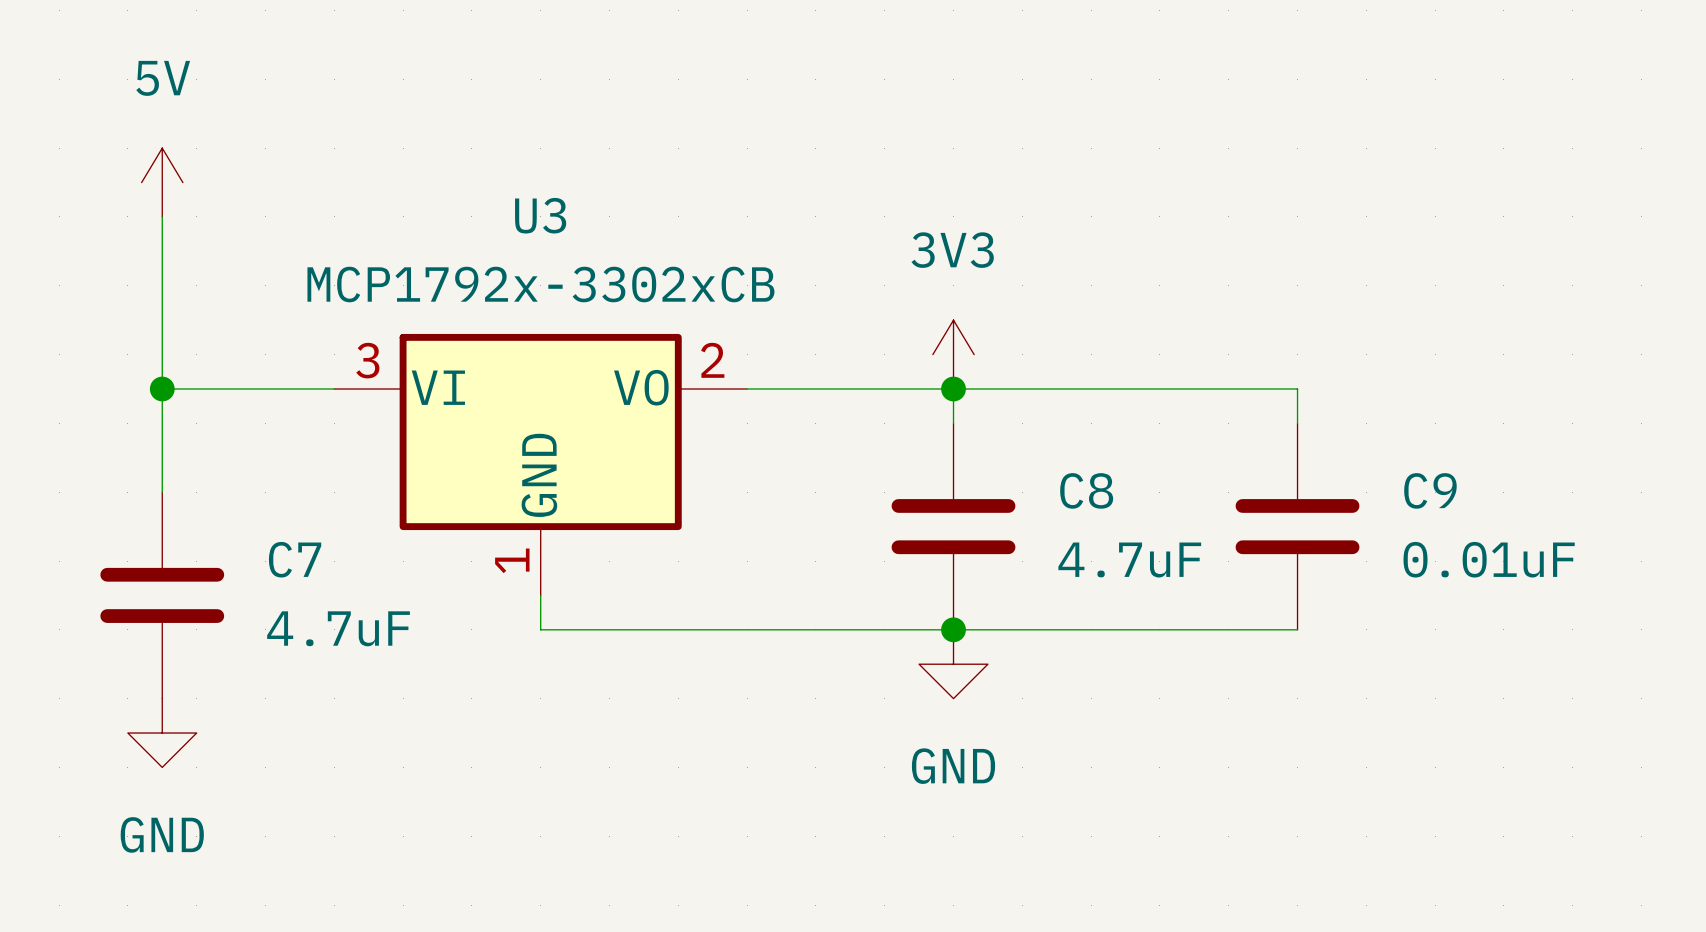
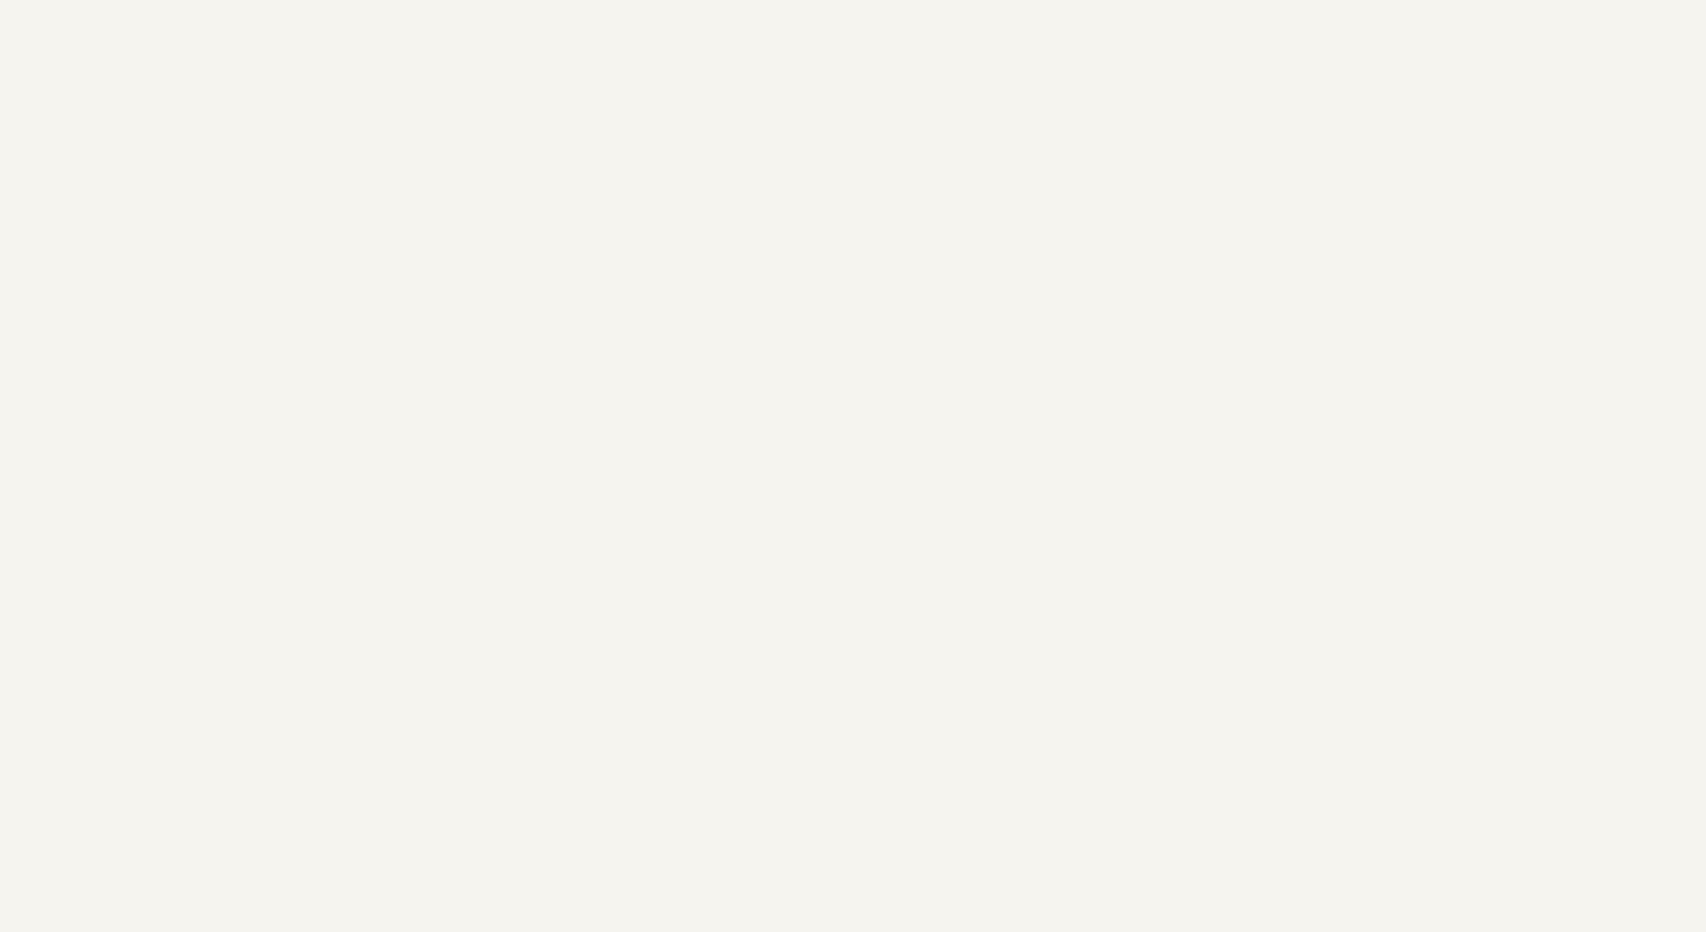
power symbol: 5V (162, 182) -> none
wire: (162, 216) (162, 492) -> none
power symbol: 3V3 (953, 354) -> none
wire: (162, 389) (334, 389) -> none
junction: (162, 389) -> none
wire: (747, 389) (1297, 389) (1297, 423) -> none
wire: (953, 389) (953, 423) -> none
junction: (953, 389) -> none
U3: MCP1792x-3302xCB (540, 464) -> none
C8: 4.7uF (953, 526) -> none
C9: 0.01uF (1297, 526) -> none
C7: 4.7uF (162, 595) -> none
wire: (540, 595) (540, 629) (1297, 629) -> none
junction: (953, 629) -> none
power symbol: GND (953, 664) -> none
power symbol: GND (162, 733) -> none

